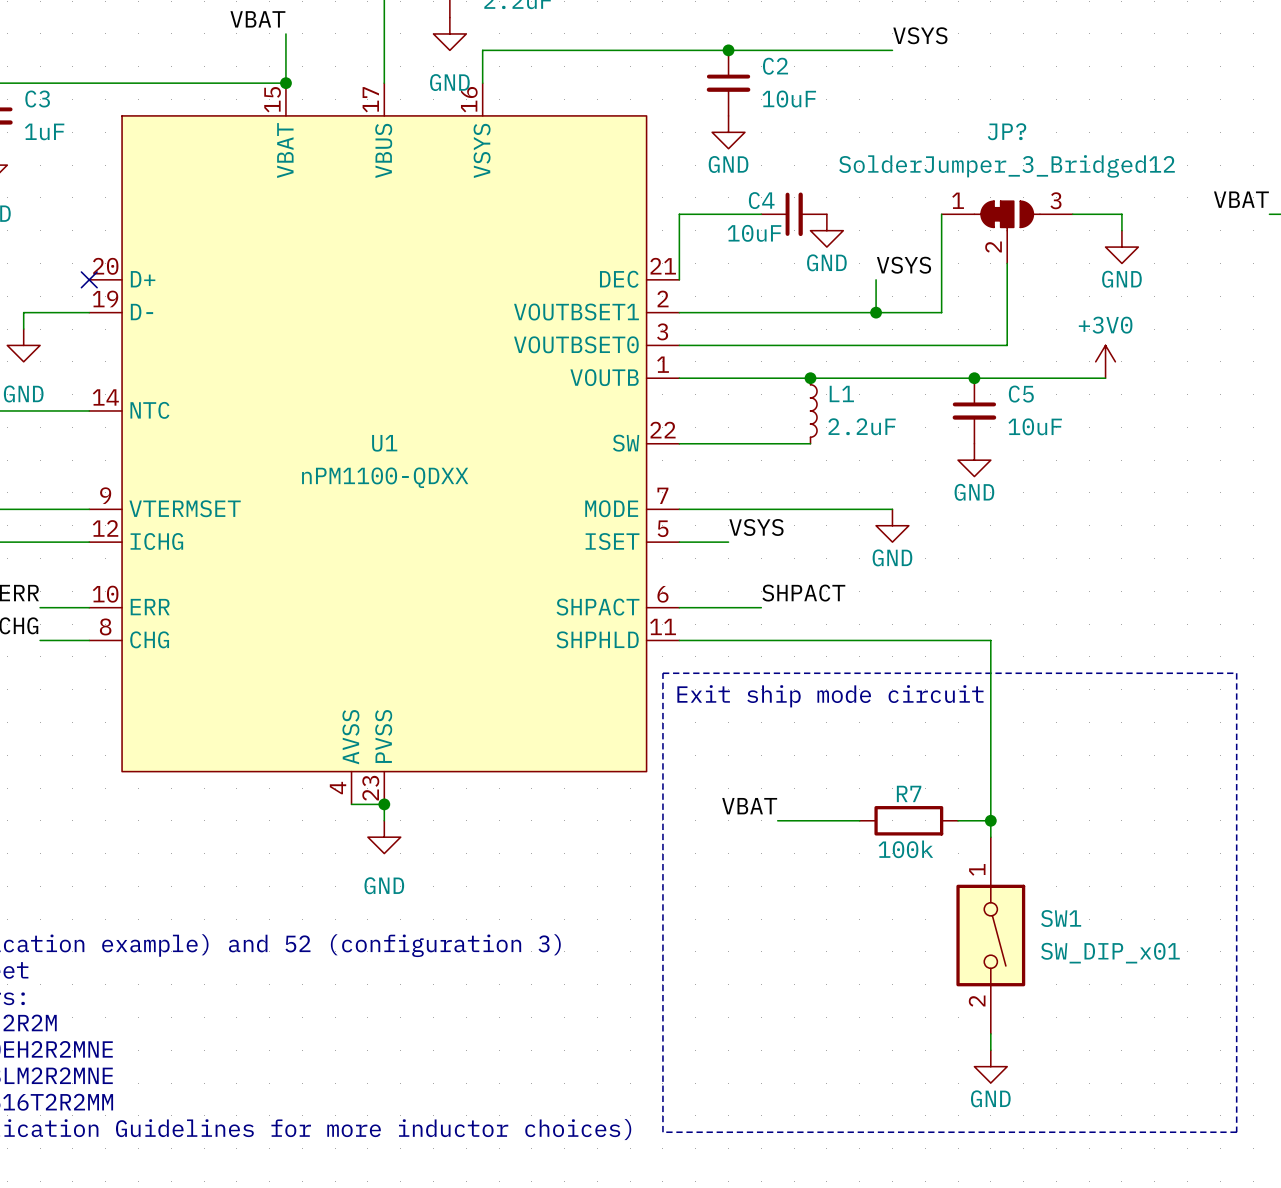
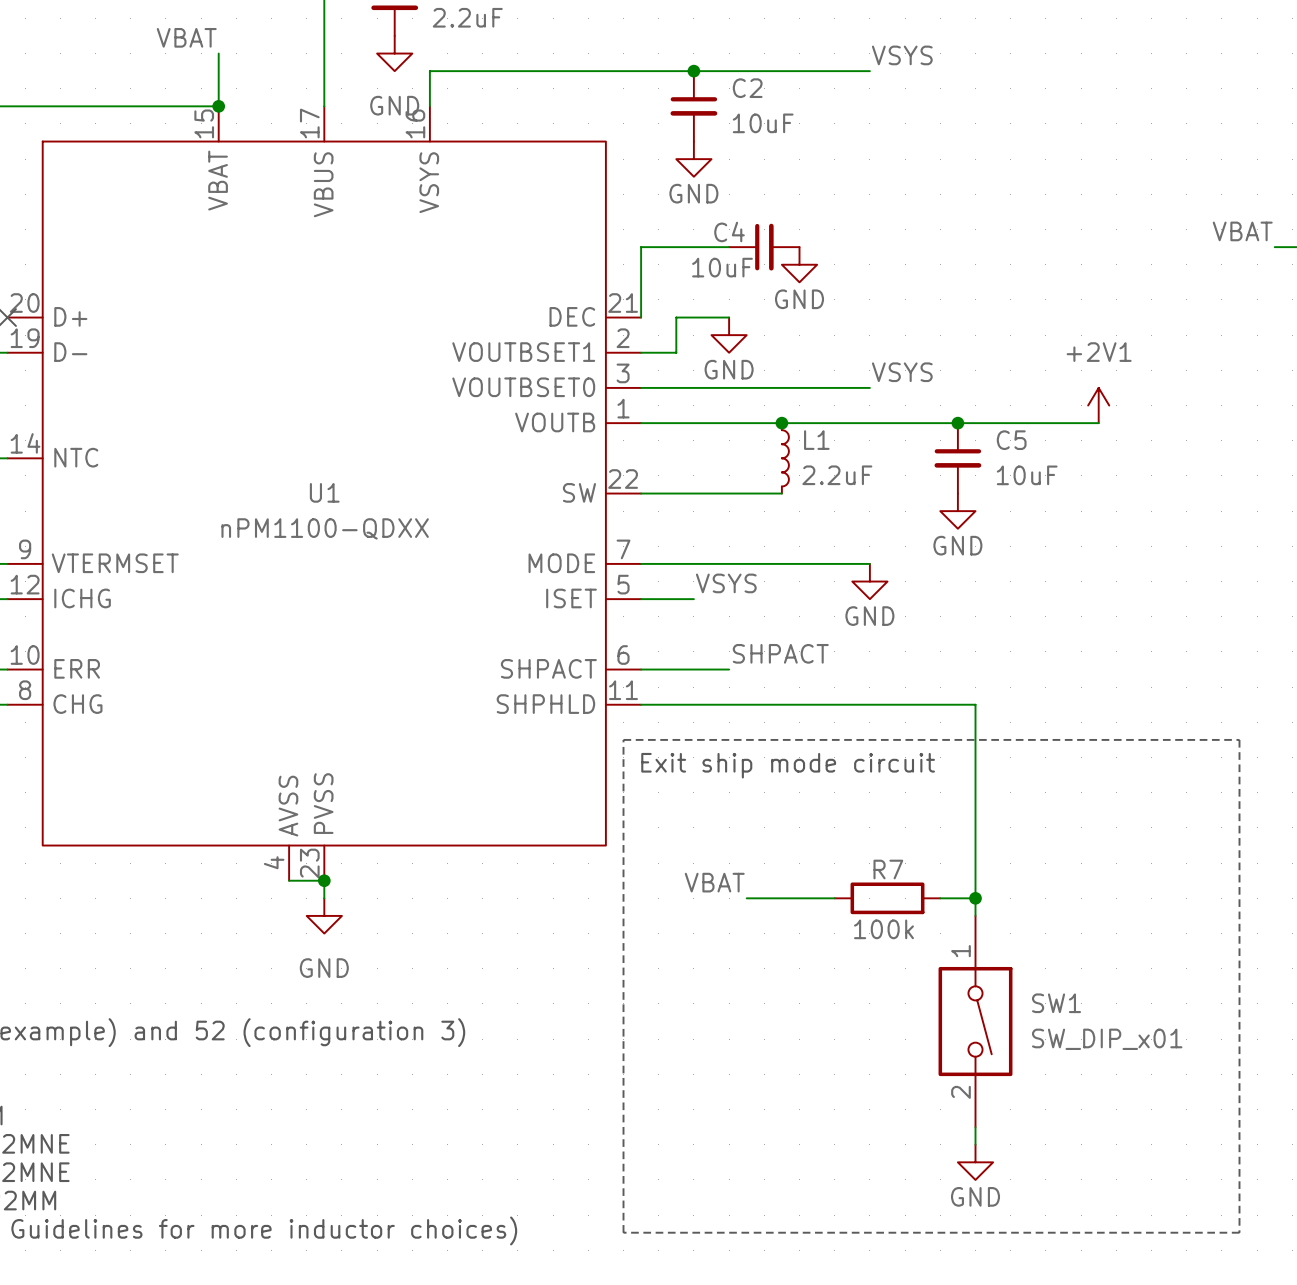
wire: (941, 214) (941, 312) (712, 312) -> (729, 317) (676, 317) (676, 352)
wire: (1072, 214) (1121, 214) (1121, 230) -> none
JP?: SolderJumper_3_Bridged12 (1007, 232) -> none
power symbol: GND (1121, 247) -> none
wire: (1007, 263) (1007, 345) (892, 345) -> none
label position: VSYS (903, 265) -> VSYS (902, 372)
wire: (876, 279) (876, 312) -> none
power symbol: none -> GND (729, 335)
junction: (876, 312) -> none
power symbol: +3V0 (1105, 361) -> +2V1 (1098, 405)

